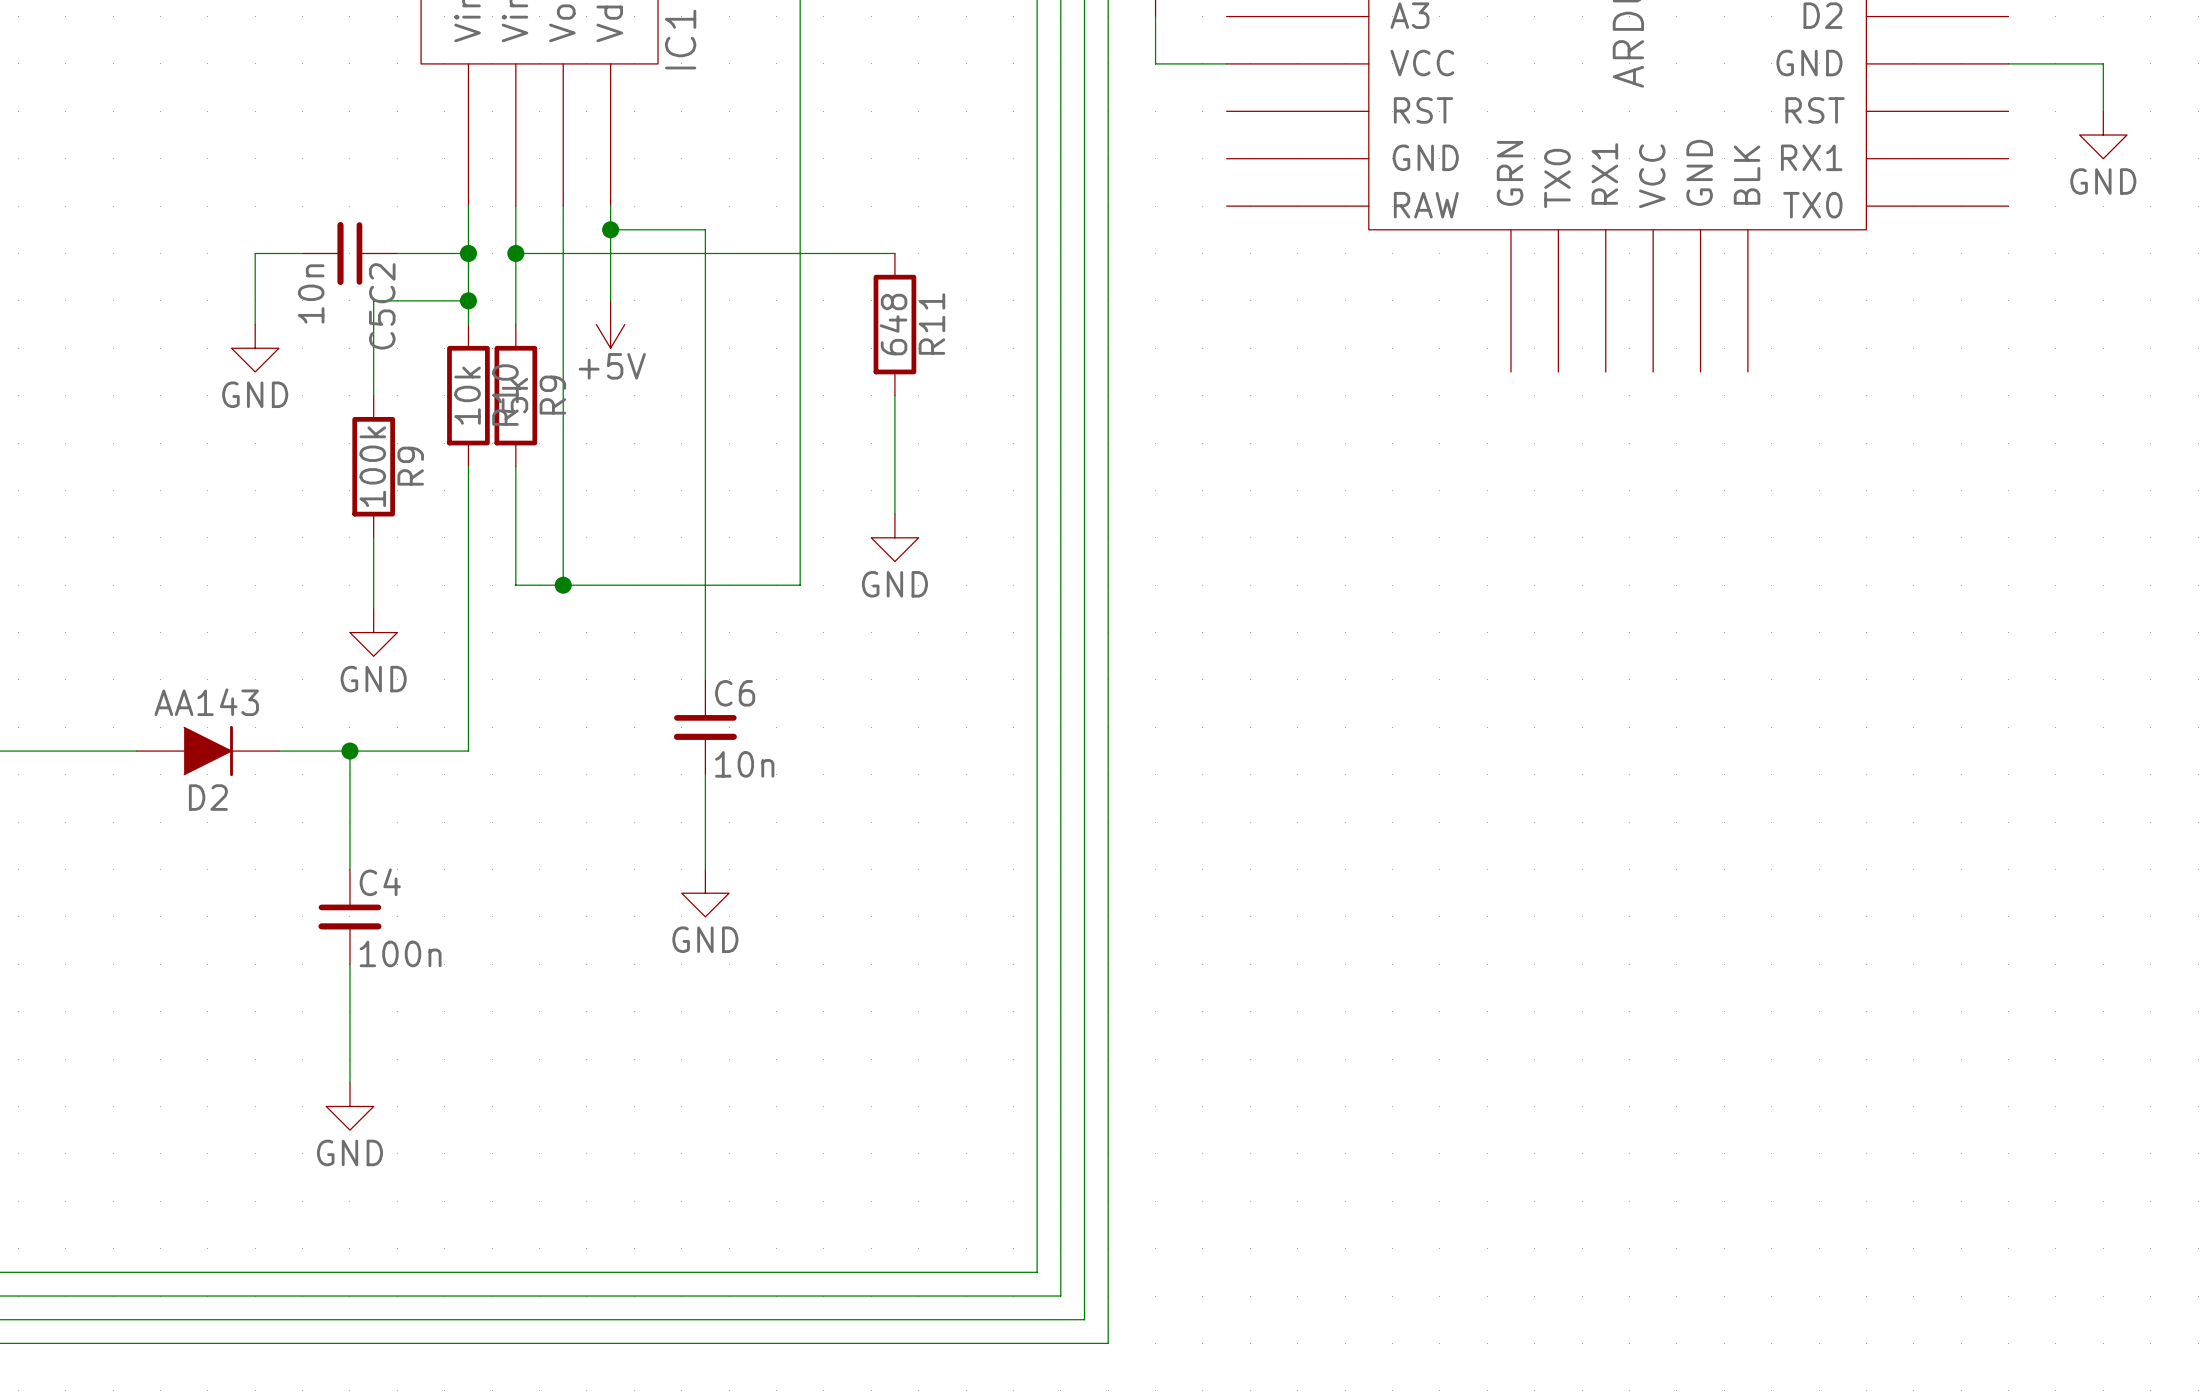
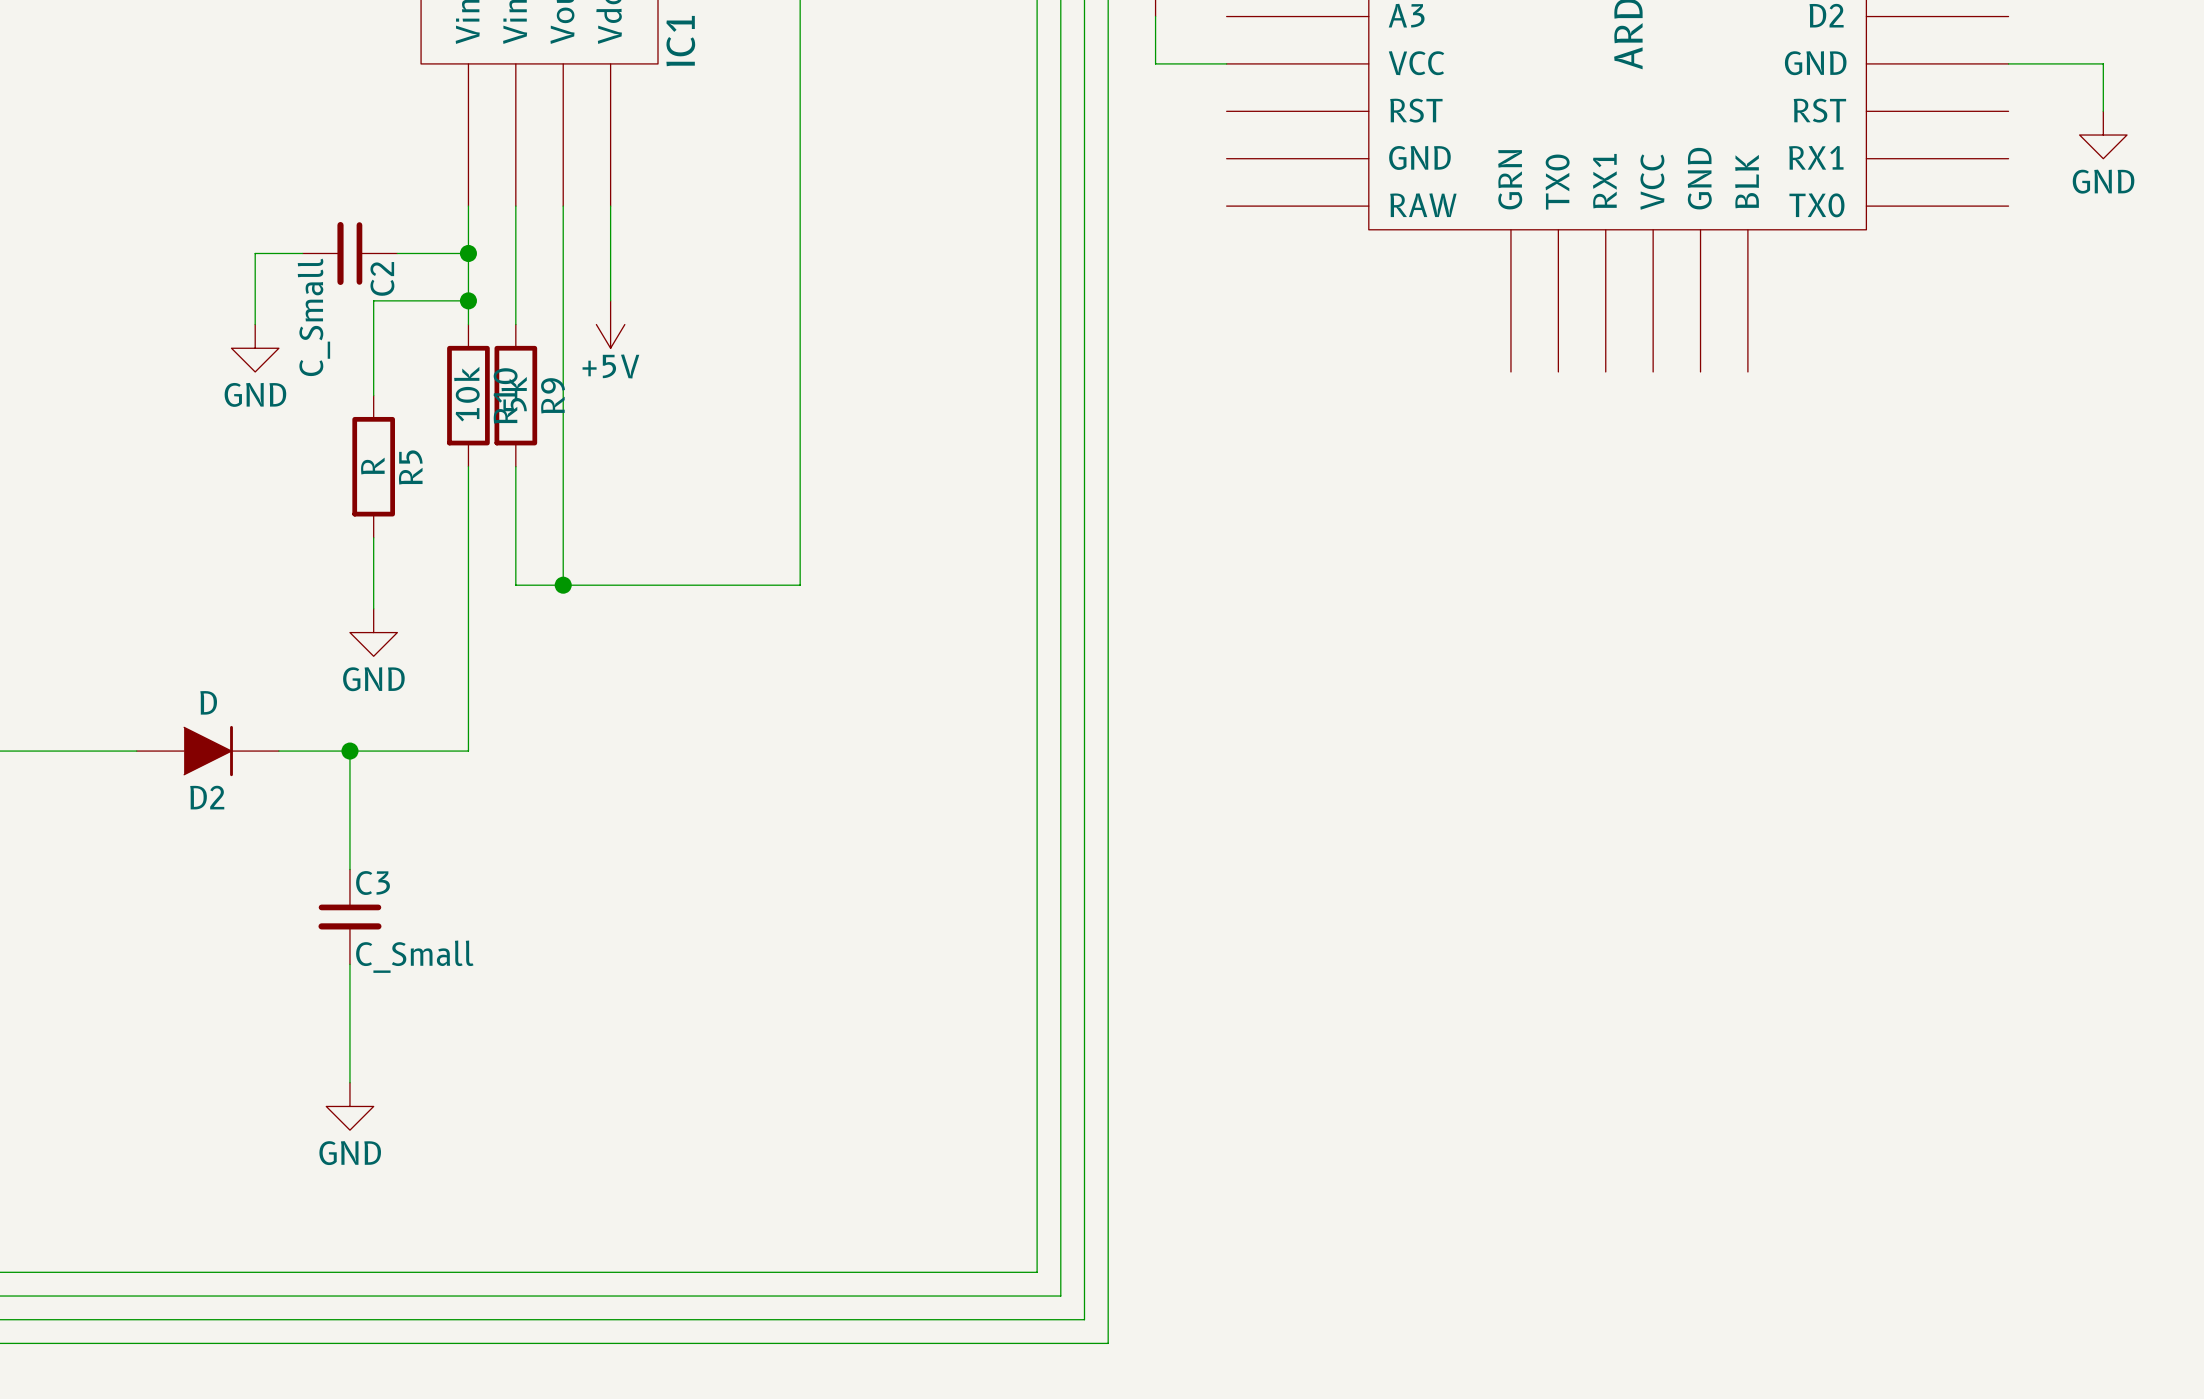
wire: (610, 229) (705, 229) (705, 679) -> none
junction: (610, 229) -> none
wire: (515, 253) (894, 253) -> none
junction: (515, 253) -> none
C5C2 value: 10n (311, 293) -> C_Small (313, 317)
C5C2 name: C5C2 (382, 306) -> C2 (382, 278)
R11: 648 (894, 324) -> none
wire: (894, 395) (894, 514) -> none
R9 value: 100k (372, 466) -> R (372, 466)
R9 name: R9 (410, 466) -> R5 (410, 467)
power symbol: GND (894, 537) -> none
D2 value: AA143 (206, 702) -> D (208, 702)
C6: 10n (705, 727) -> none
wire: (705, 774) (705, 869) -> none
C4 name: C4 (380, 882) -> C3 (373, 883)
power symbol: GND (705, 893) -> none
C4 value: 100n (400, 953) -> C_Small (414, 956)

